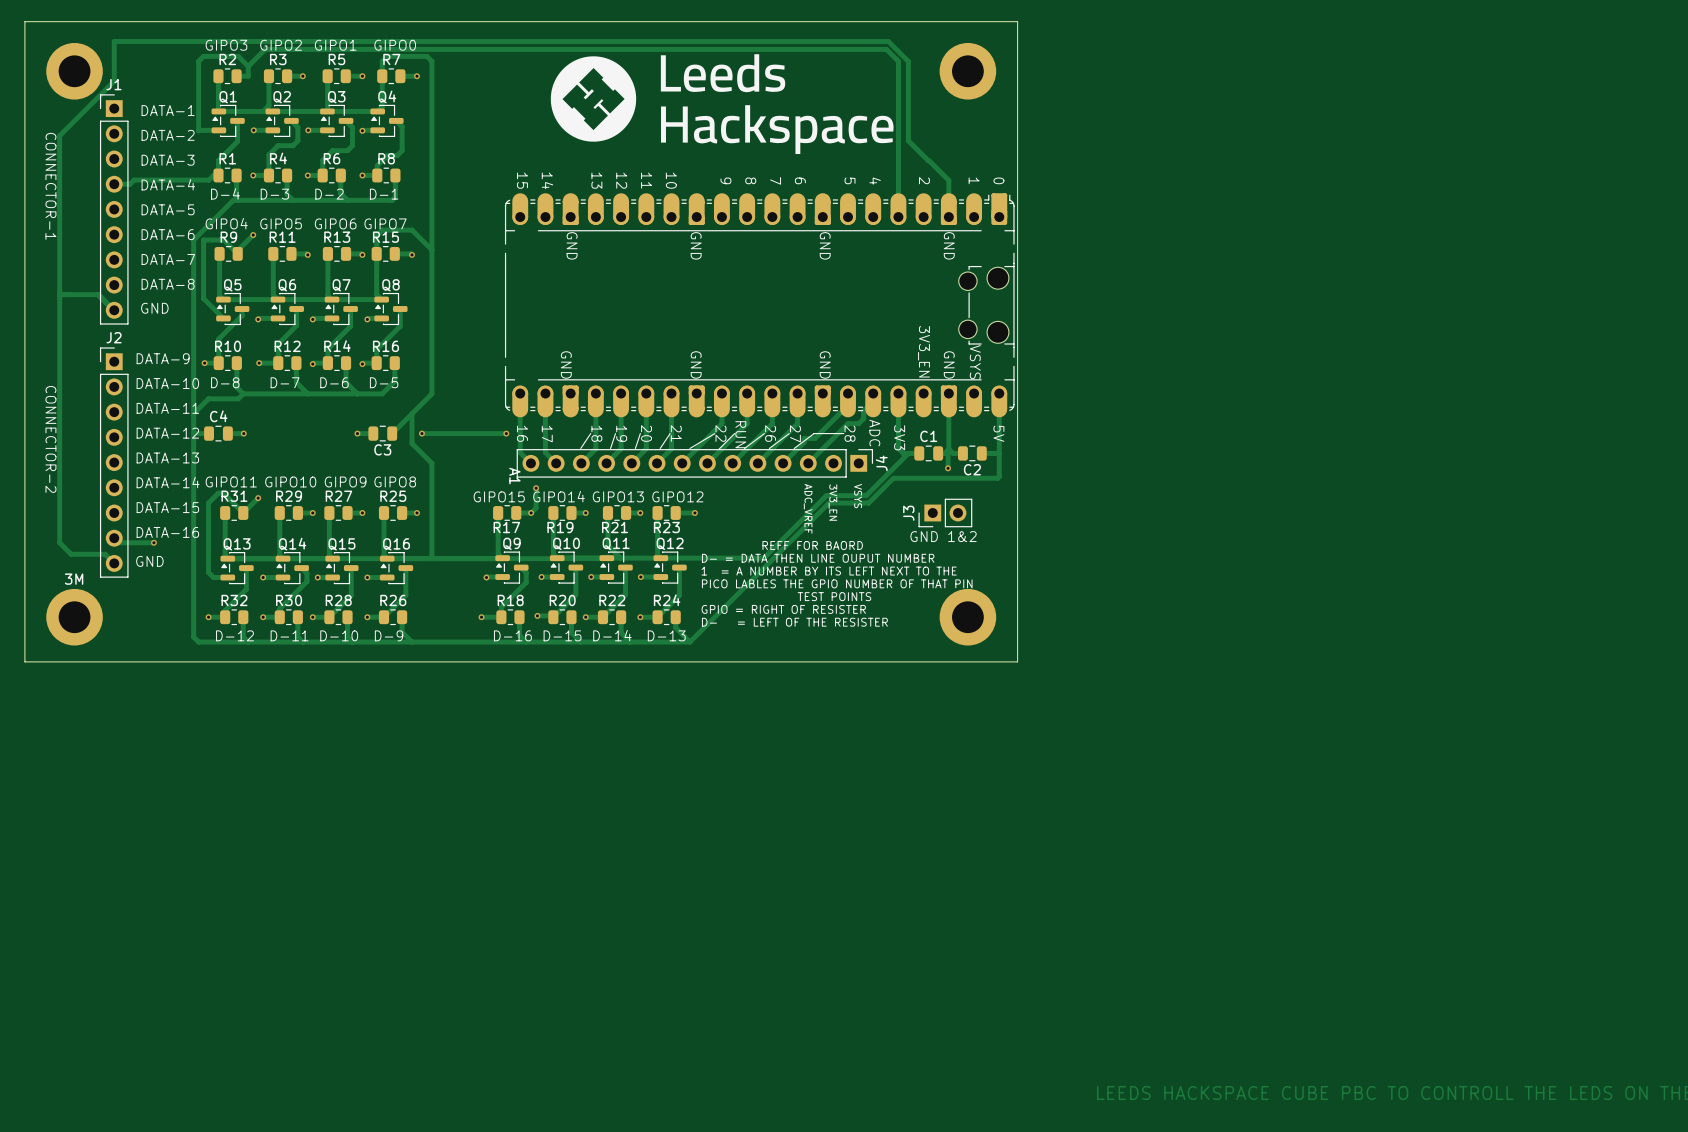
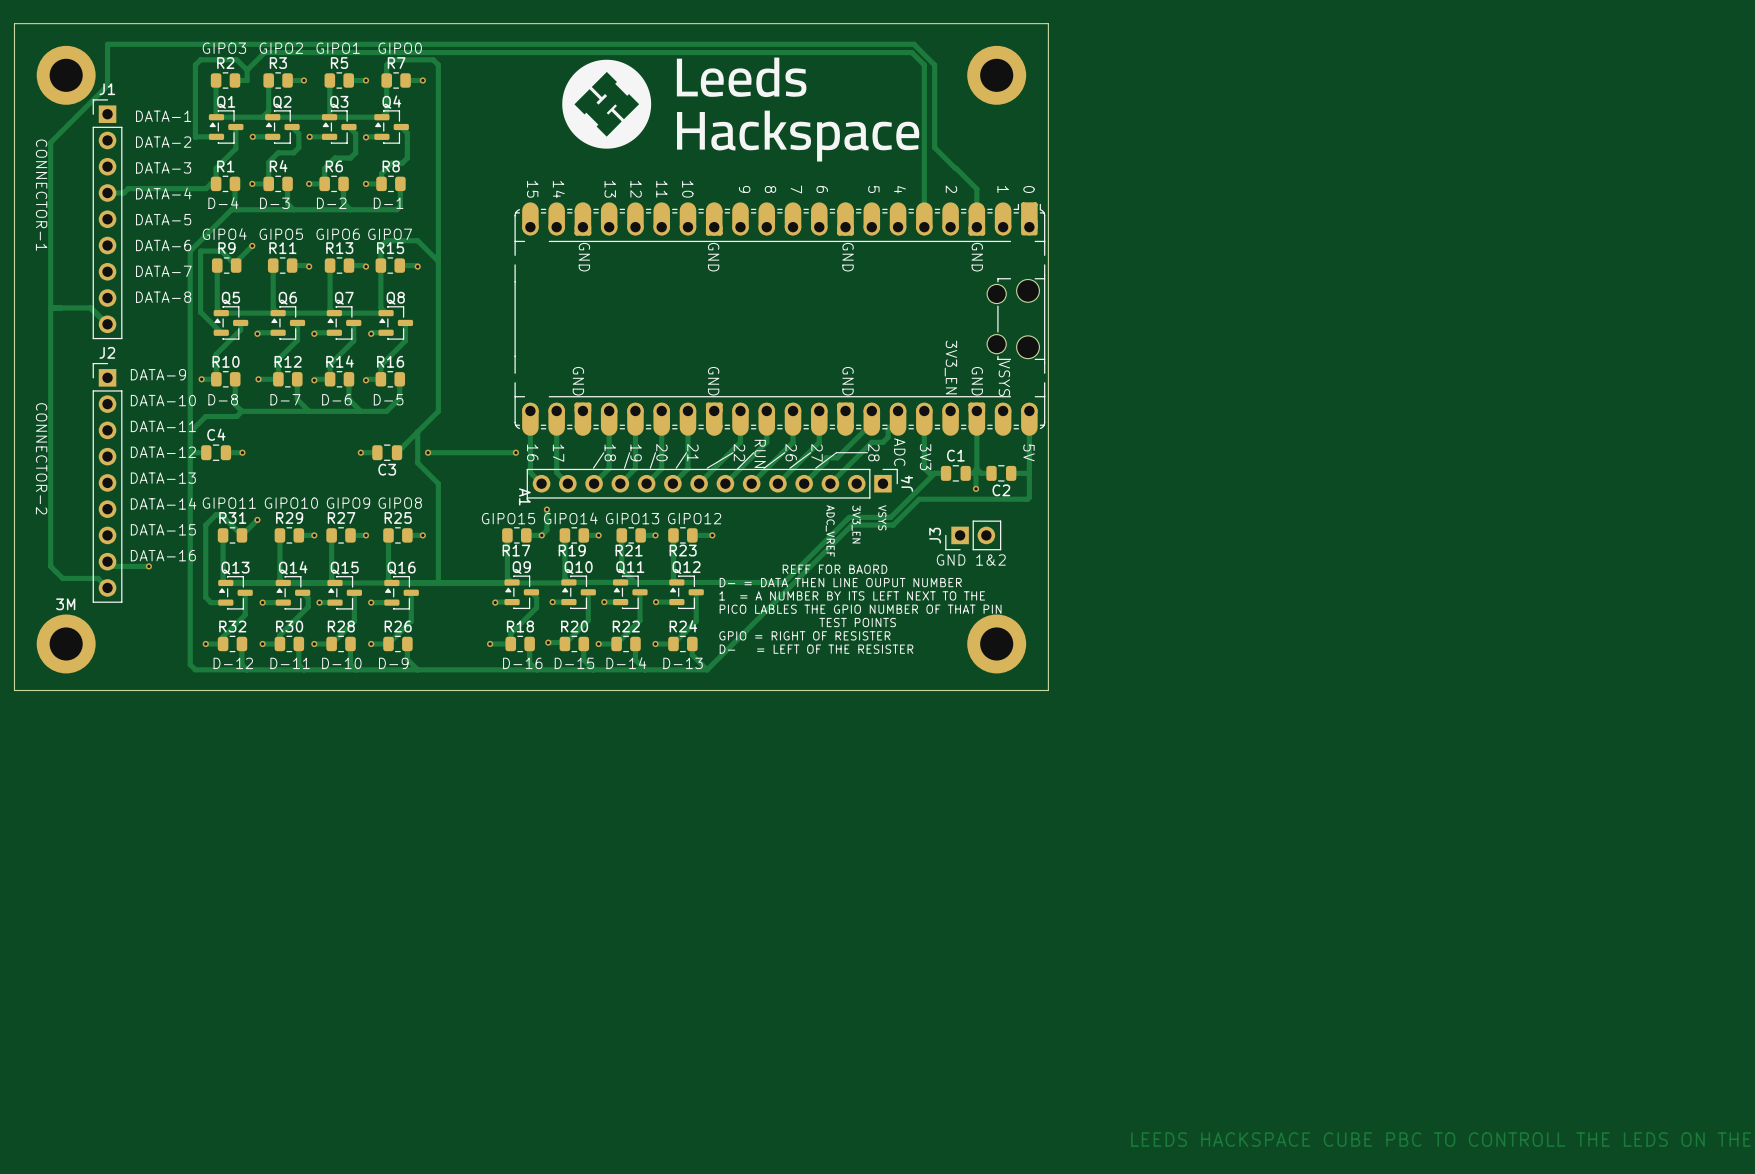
text: GND (154, 308) -> none
text: GND (149, 561) -> none

